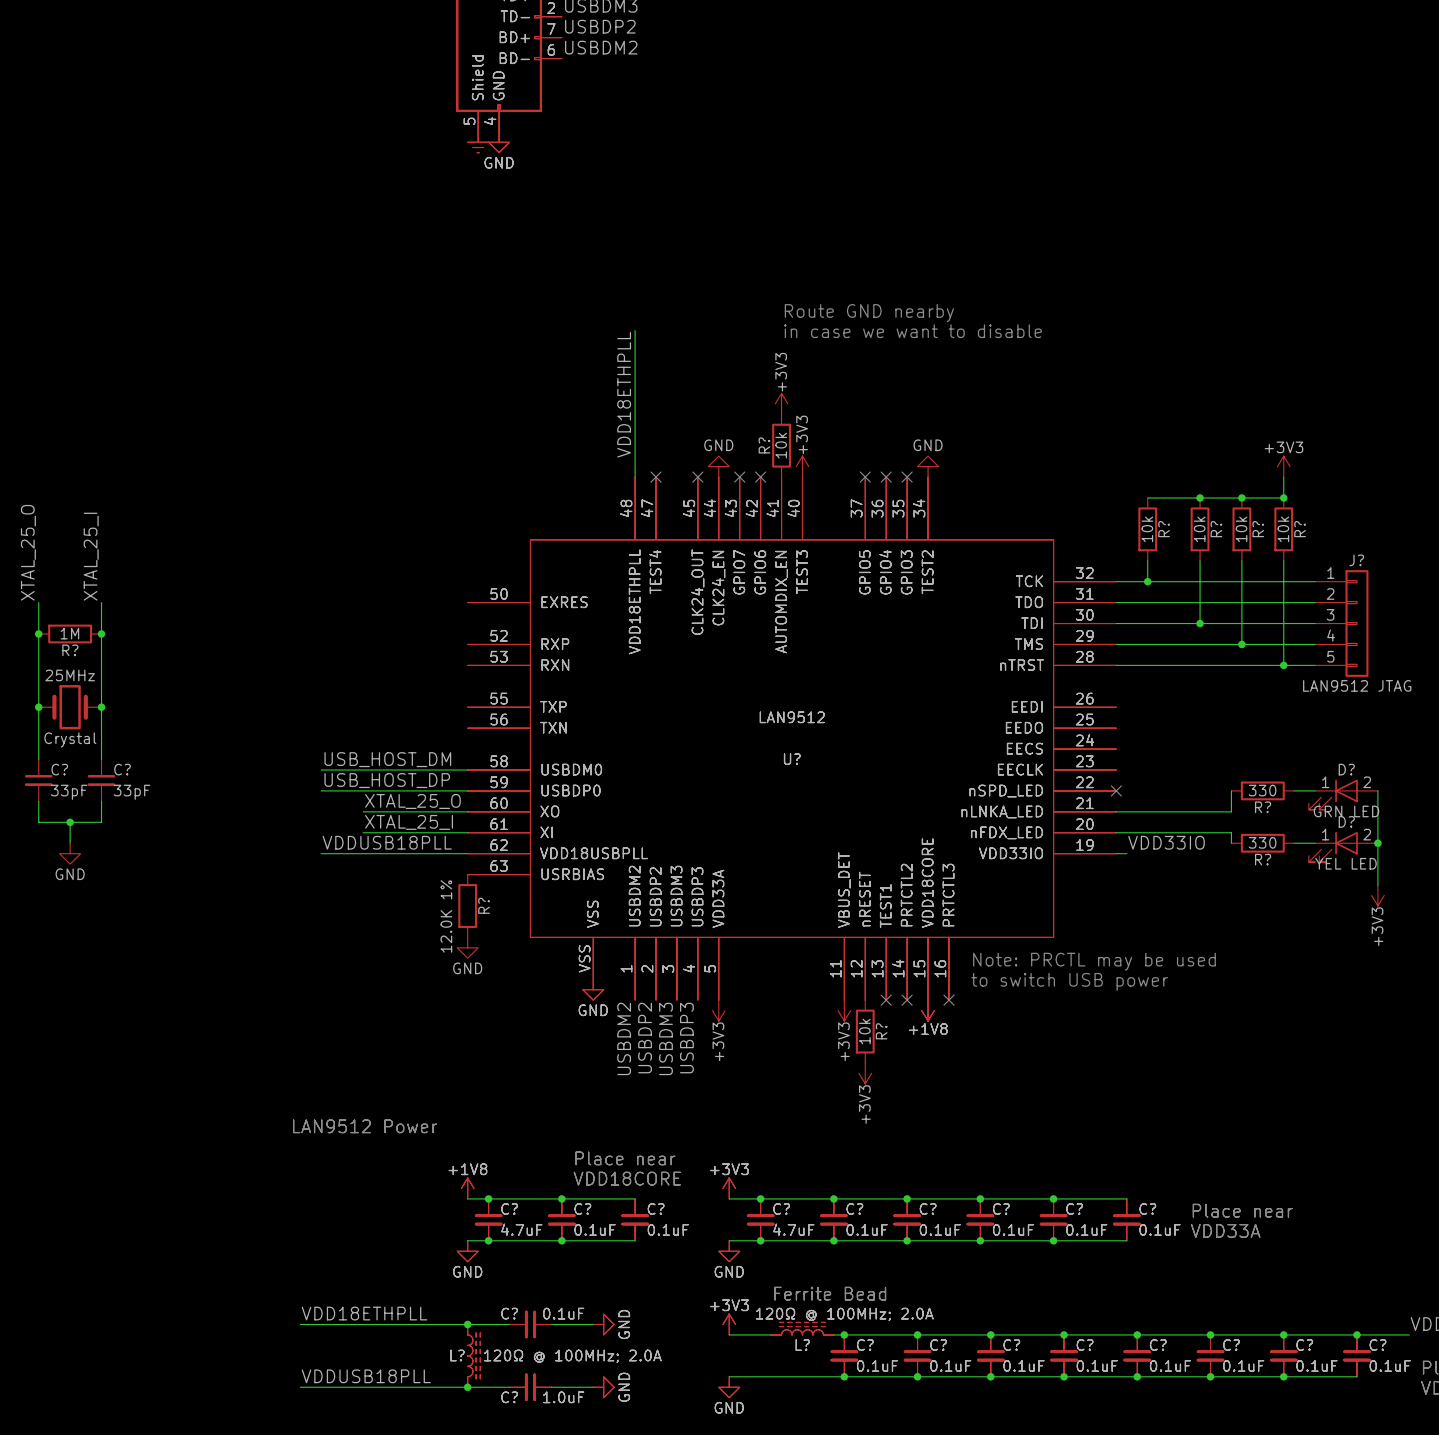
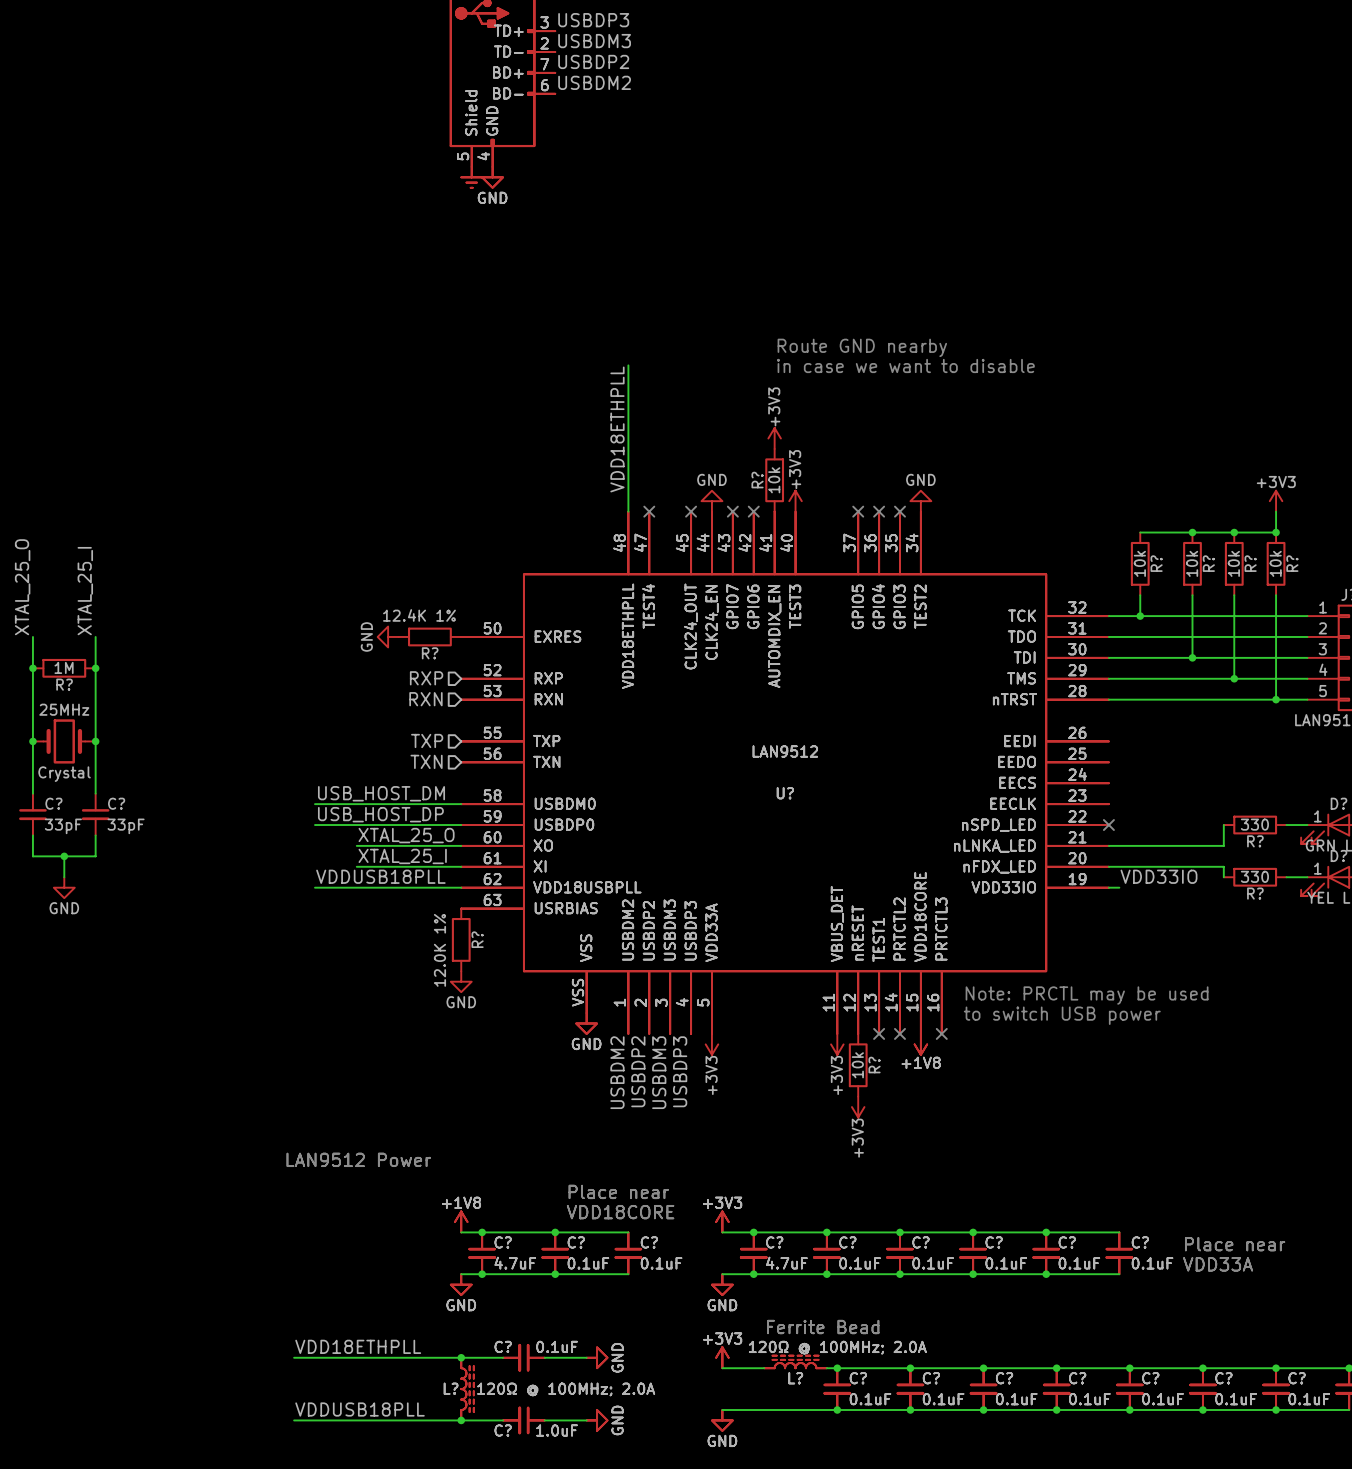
power symbol: none -> GND (388, 636)
R?: none -> 12.4K 1% (429, 636)
hierarchical label: none -> RXP (426, 678)
hierarchical label: none -> RXN (425, 699)
hierarchical label: none -> TXP (427, 740)
hierarchical label: none -> TXN (426, 761)

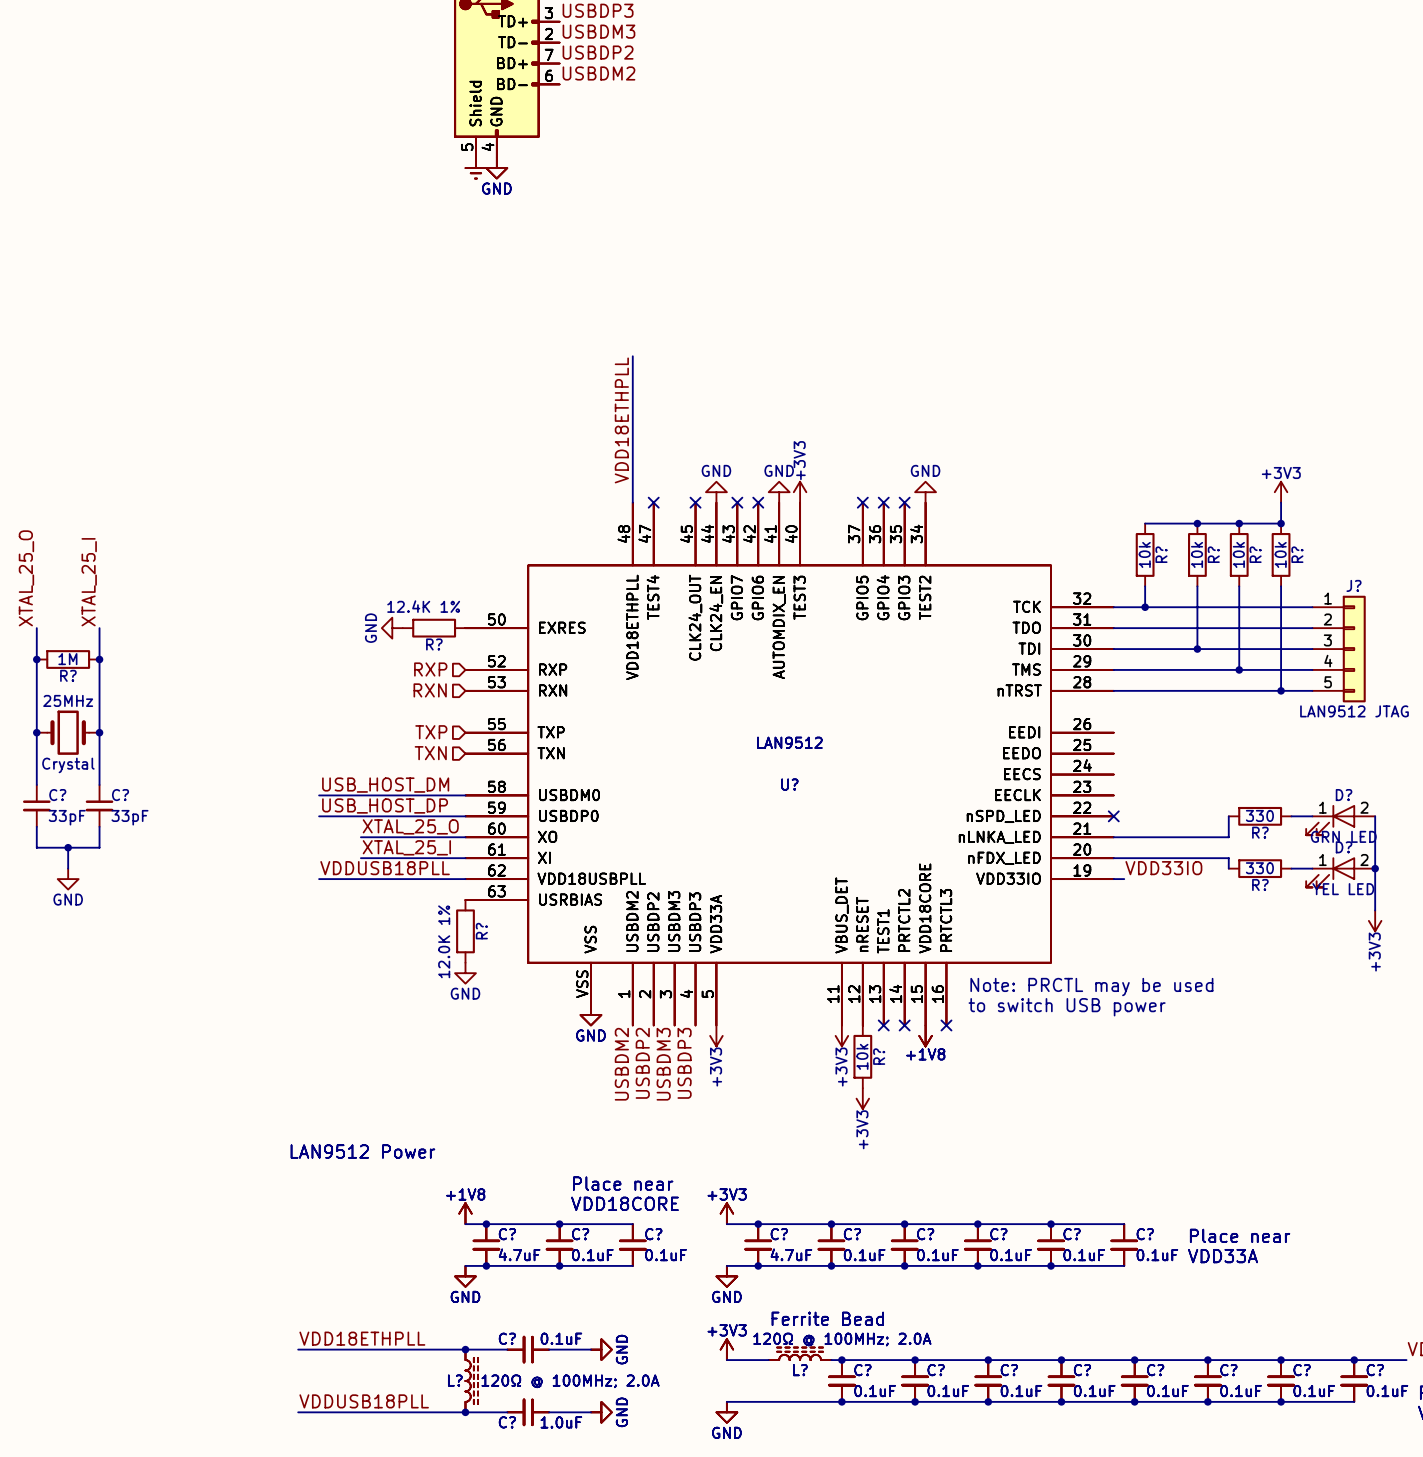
text: Route GND nearby (862, 347) -> none
text: in case we want to disable (905, 365) -> none
power symbol: +3V3 (774, 438) -> none
R?: 10k (774, 480) -> none
power symbol: none -> GND (779, 492)

